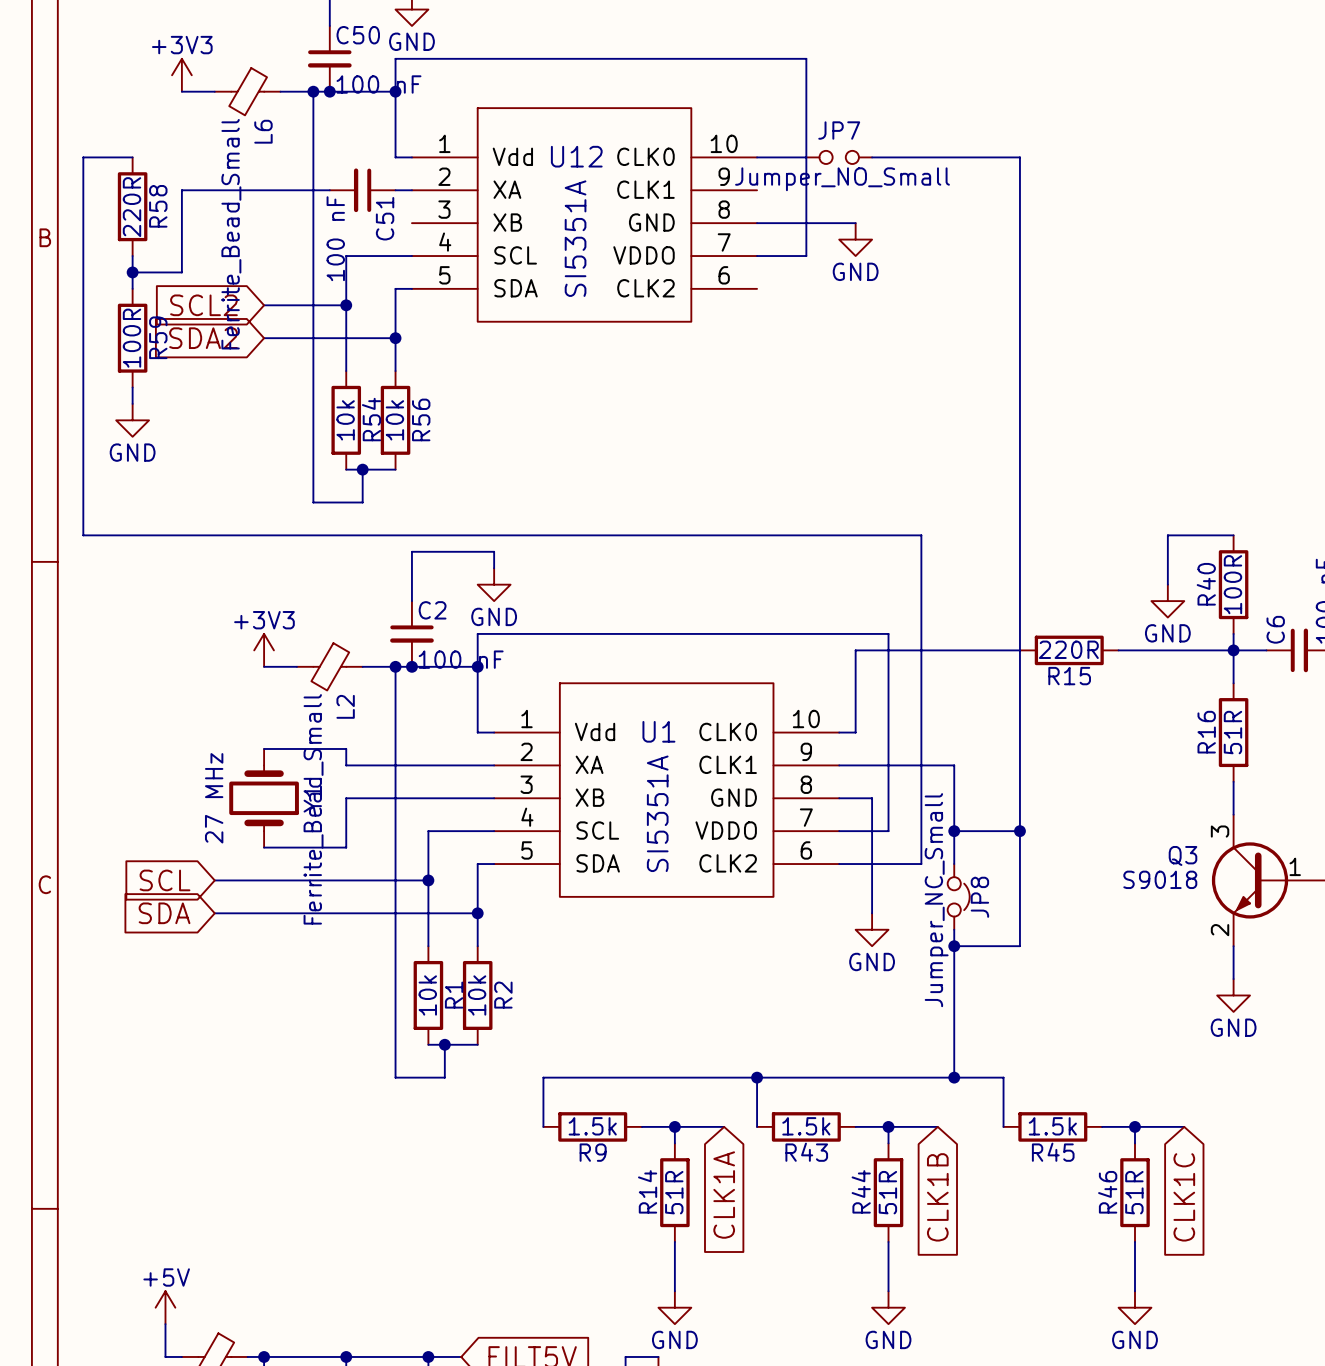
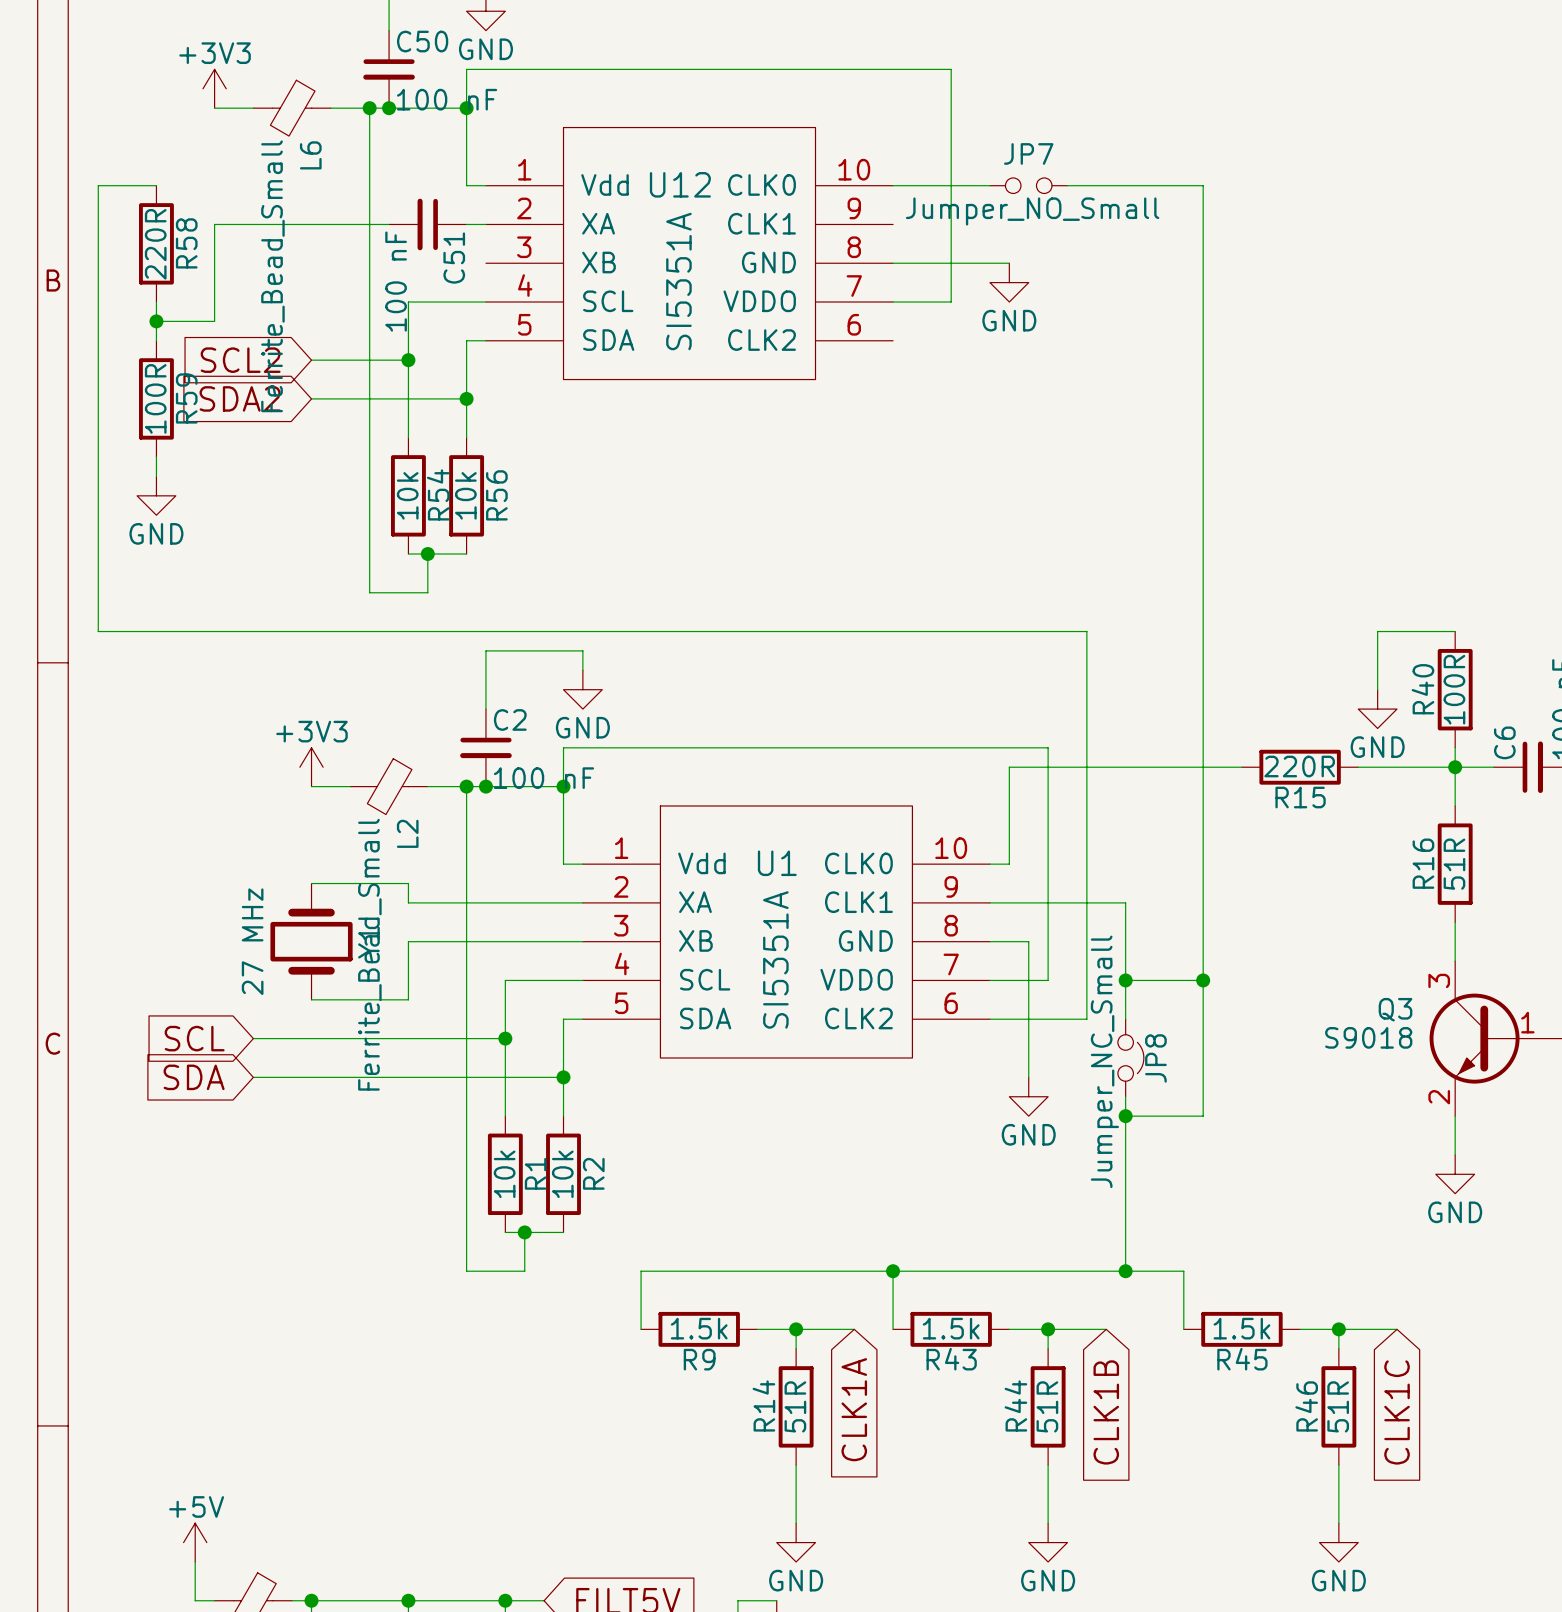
JP7 position: (839, 157) -> (1028, 185)
wire: (872, 157) (904, 157) -> (951, 185) (989, 185)
R15 position: (1069, 650) -> (1300, 767)

